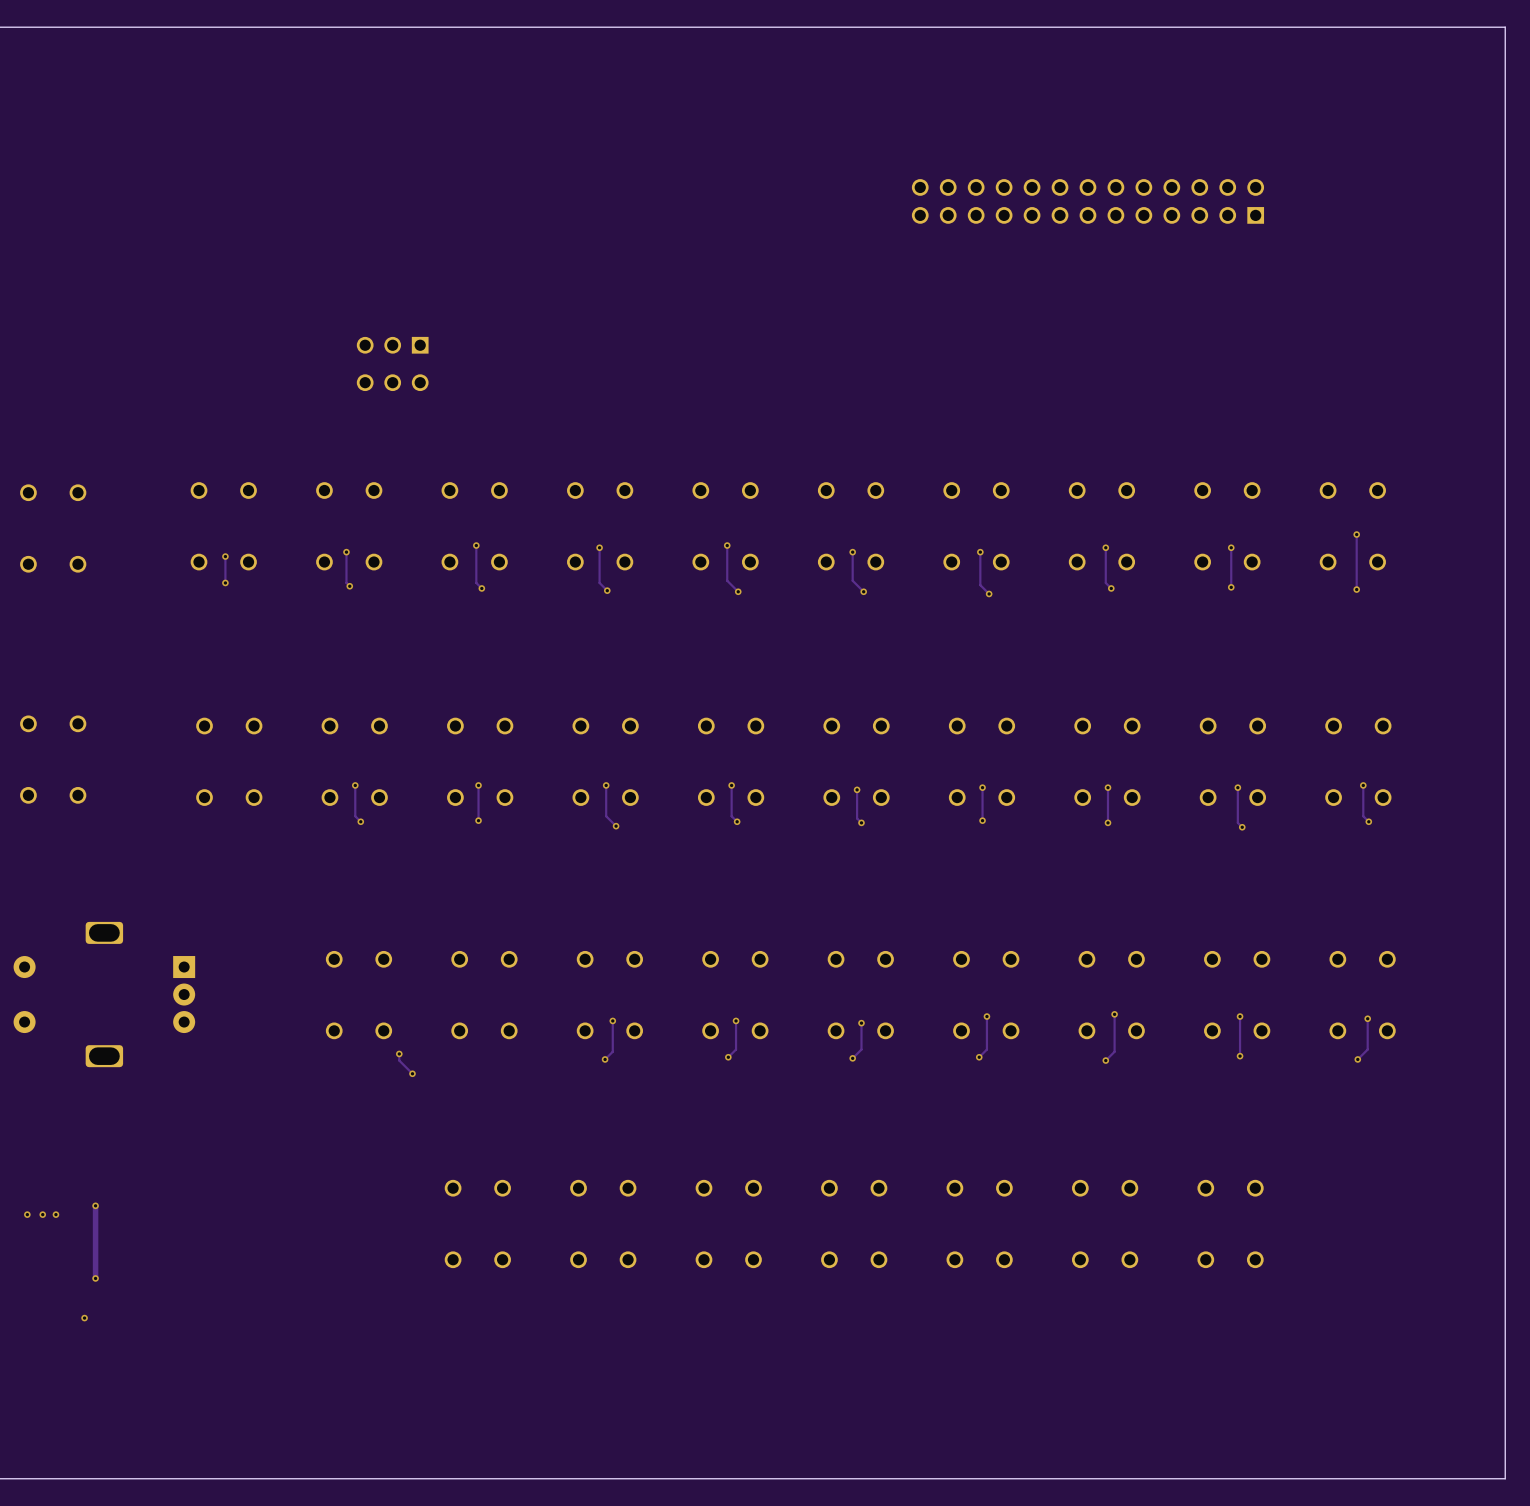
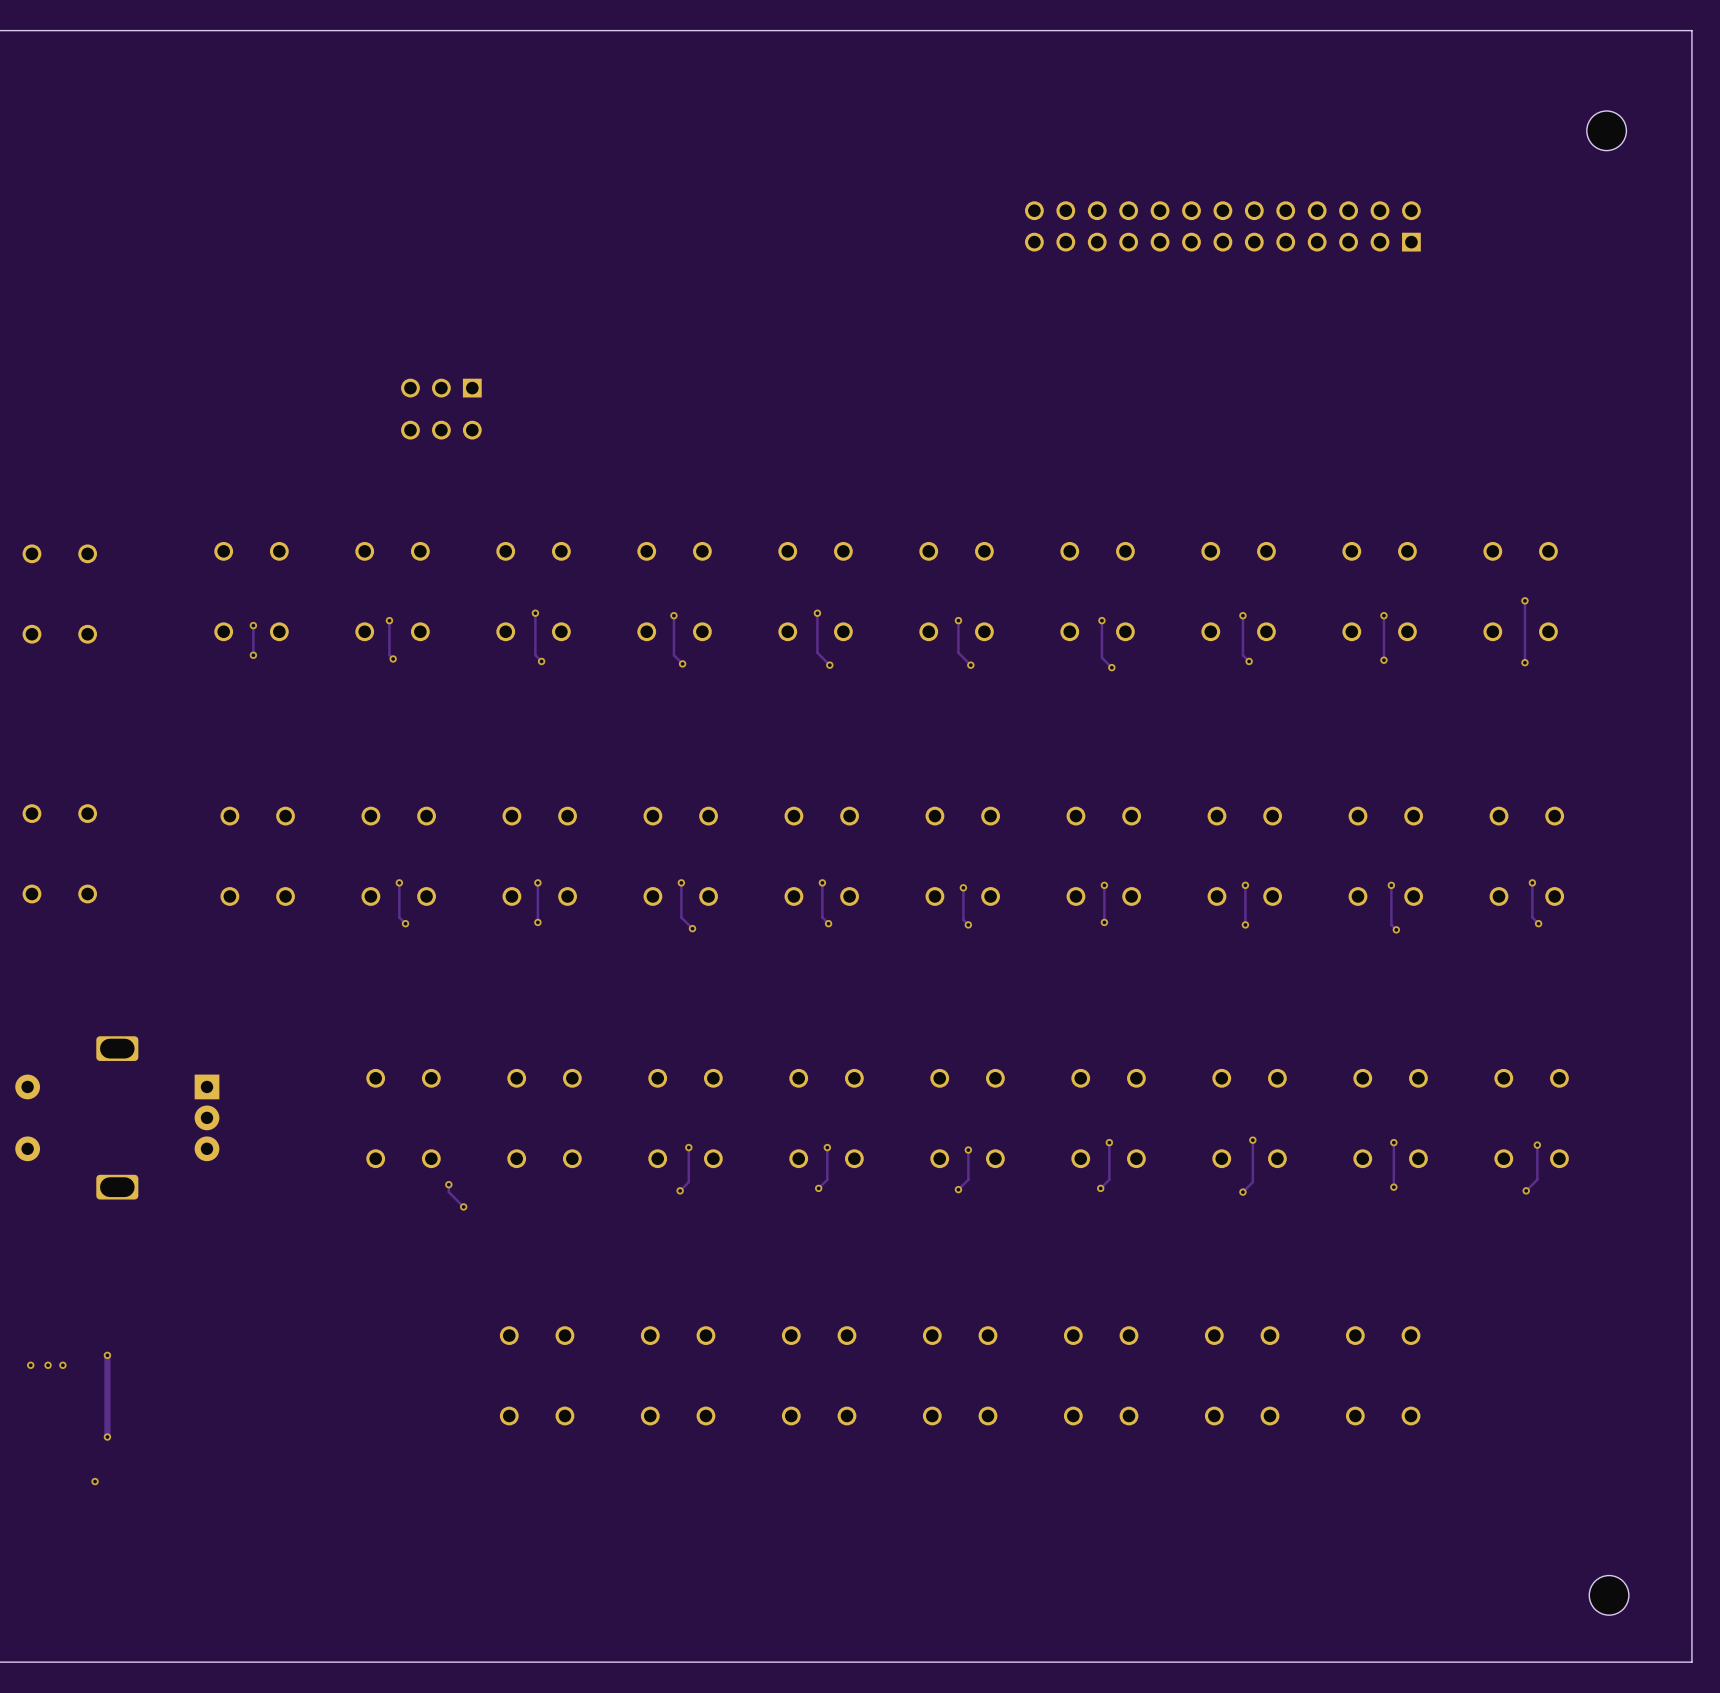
part: none -> (1606, 130)
part: none -> (1609, 1595)

